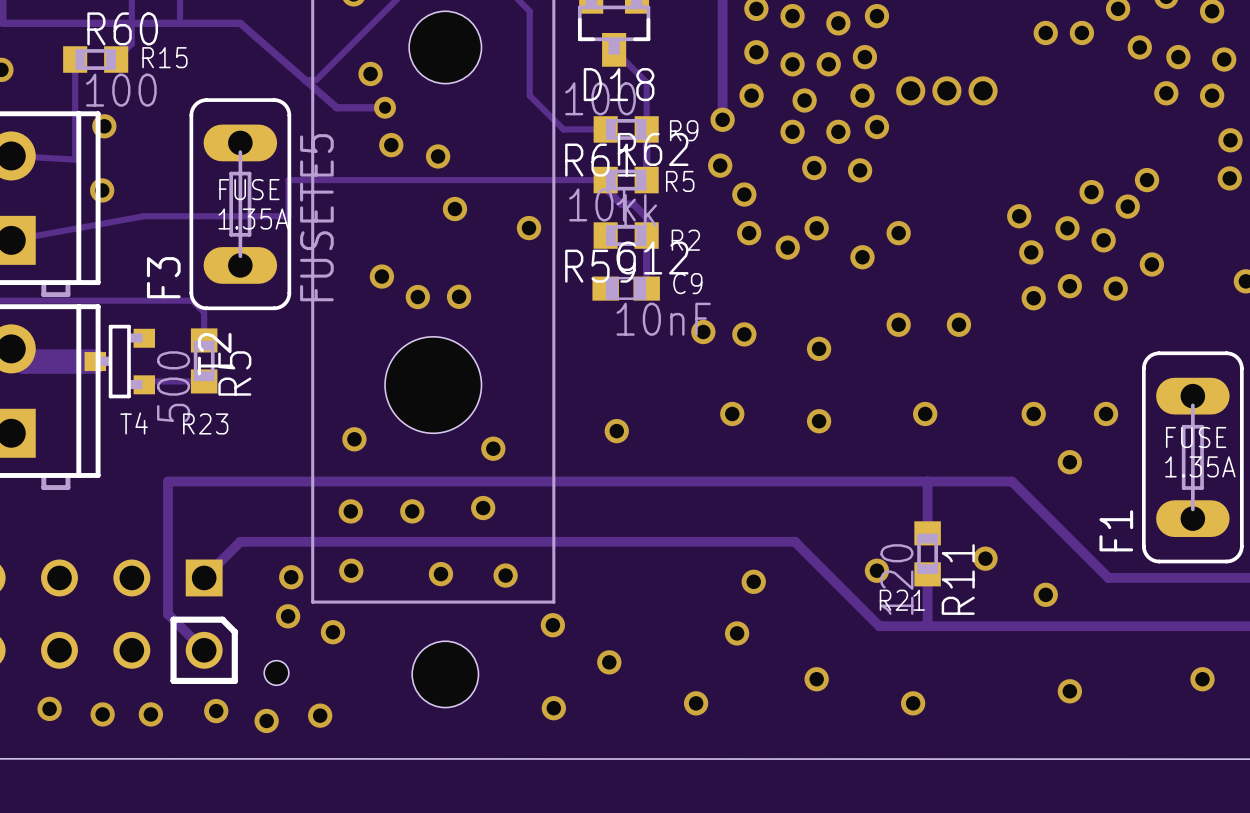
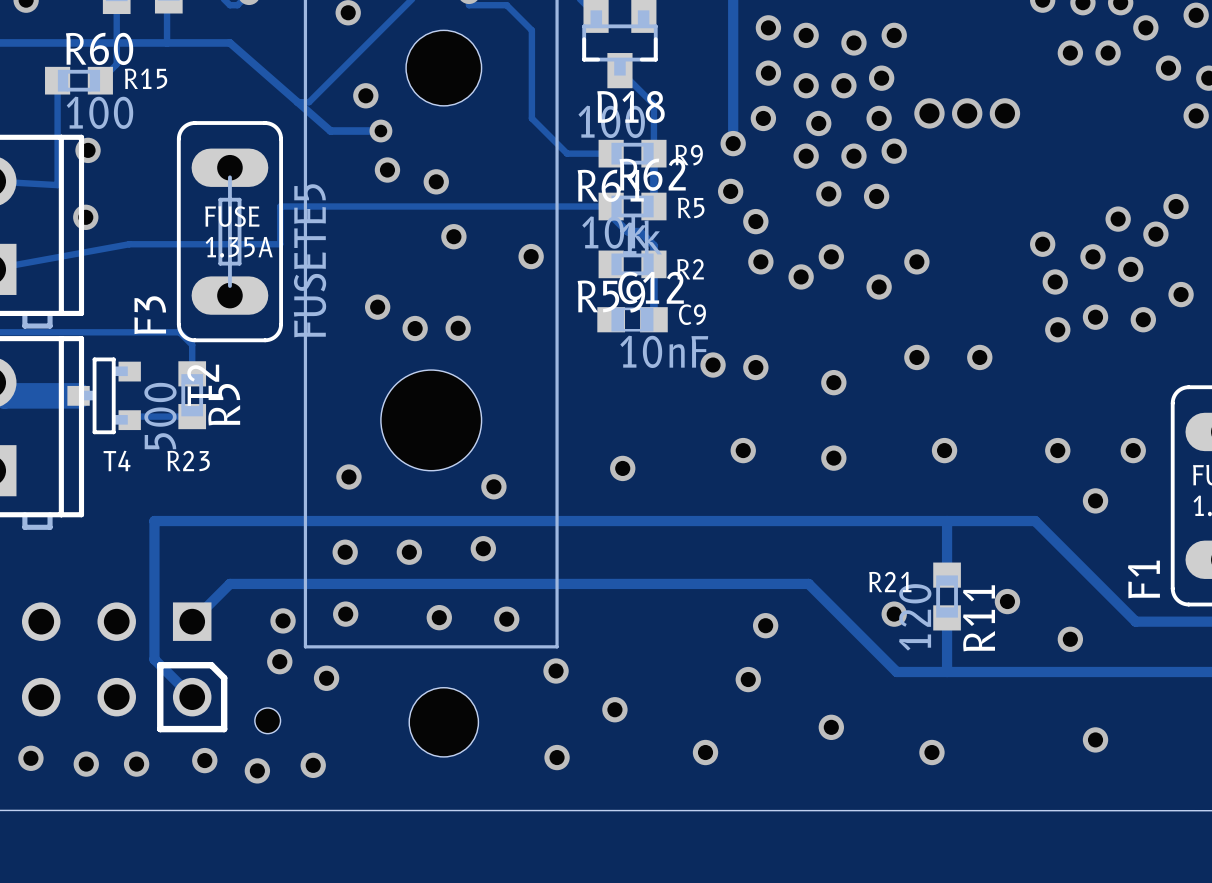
text position: R21 (902, 600) -> R21 (890, 582)

